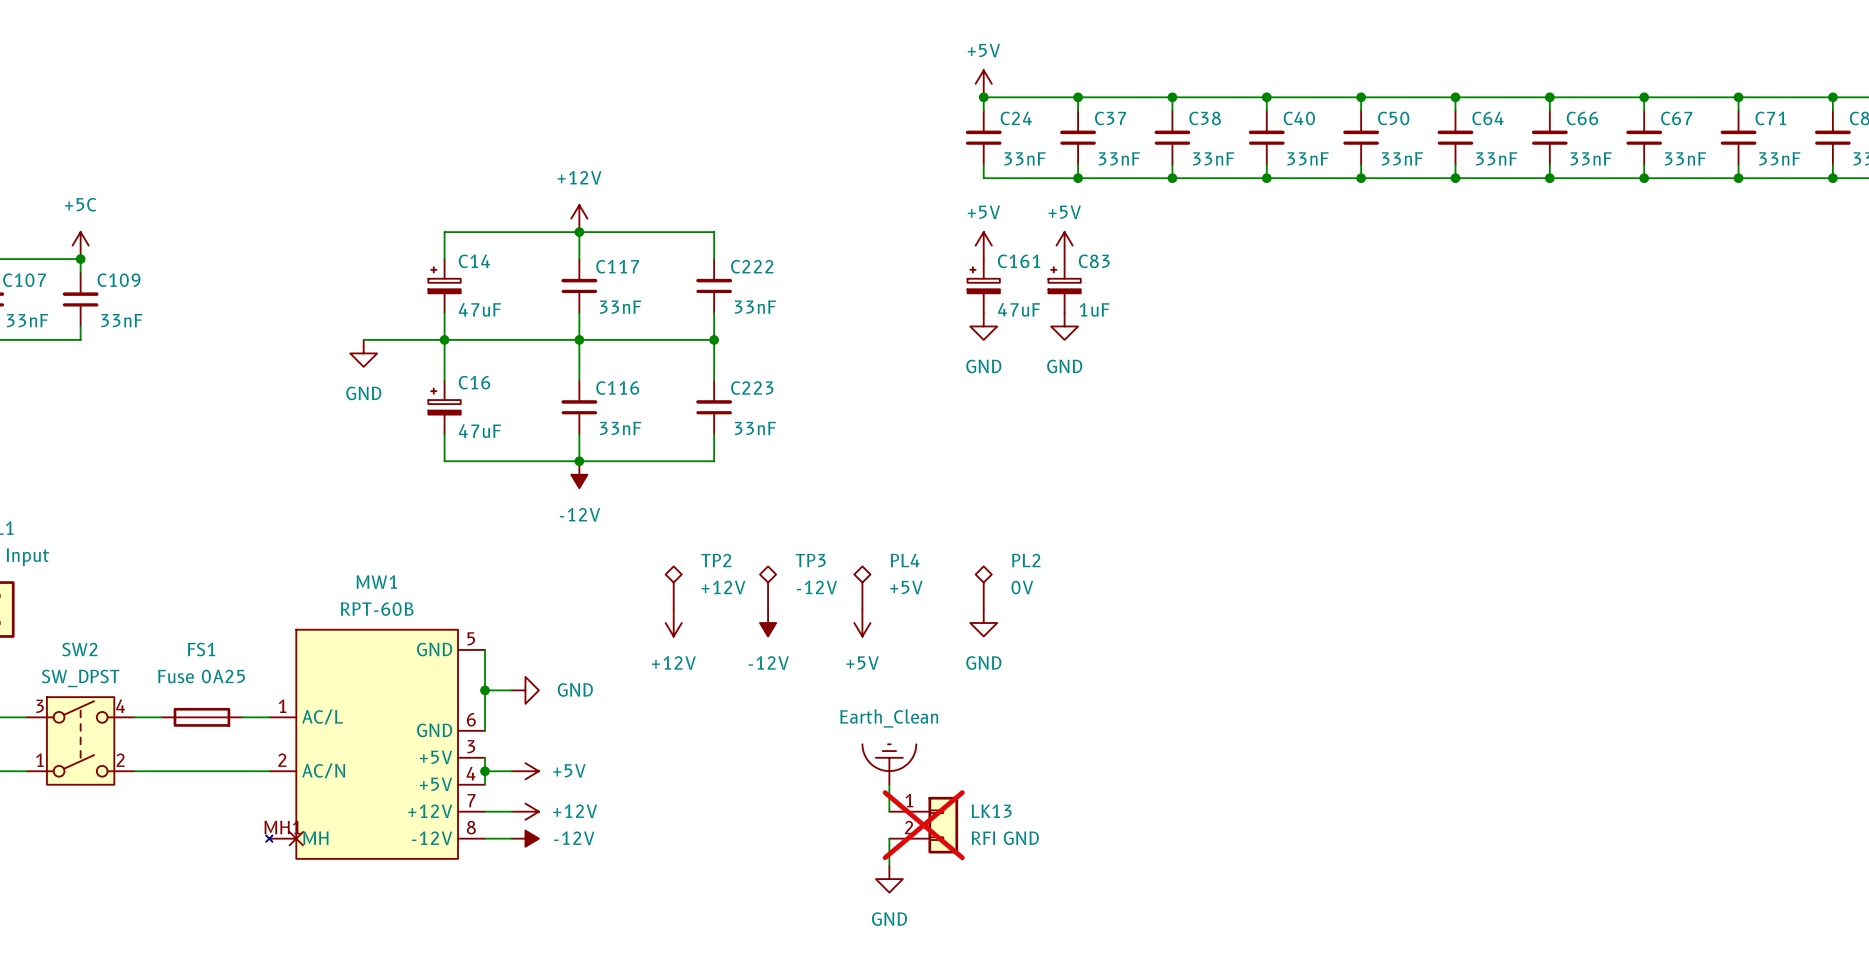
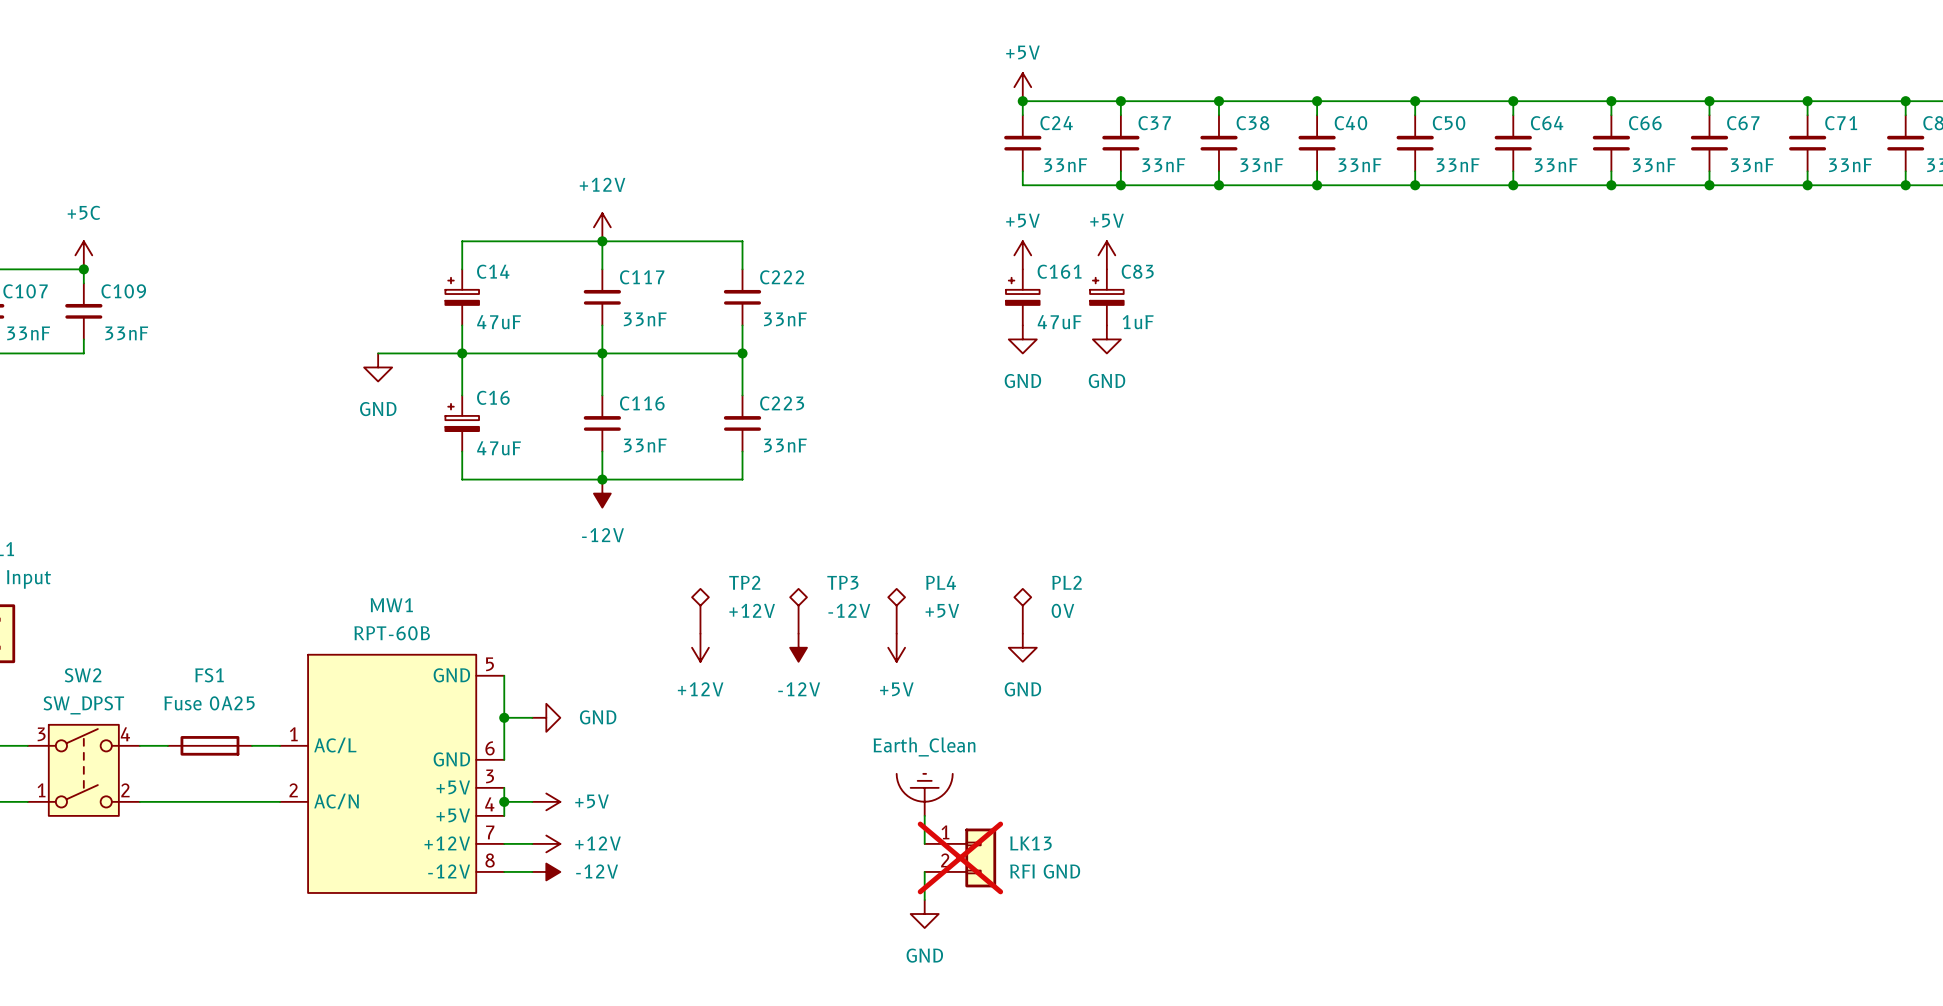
MW1 symbol: [266, 629, 486, 859] -> [280, 654, 505, 893]

